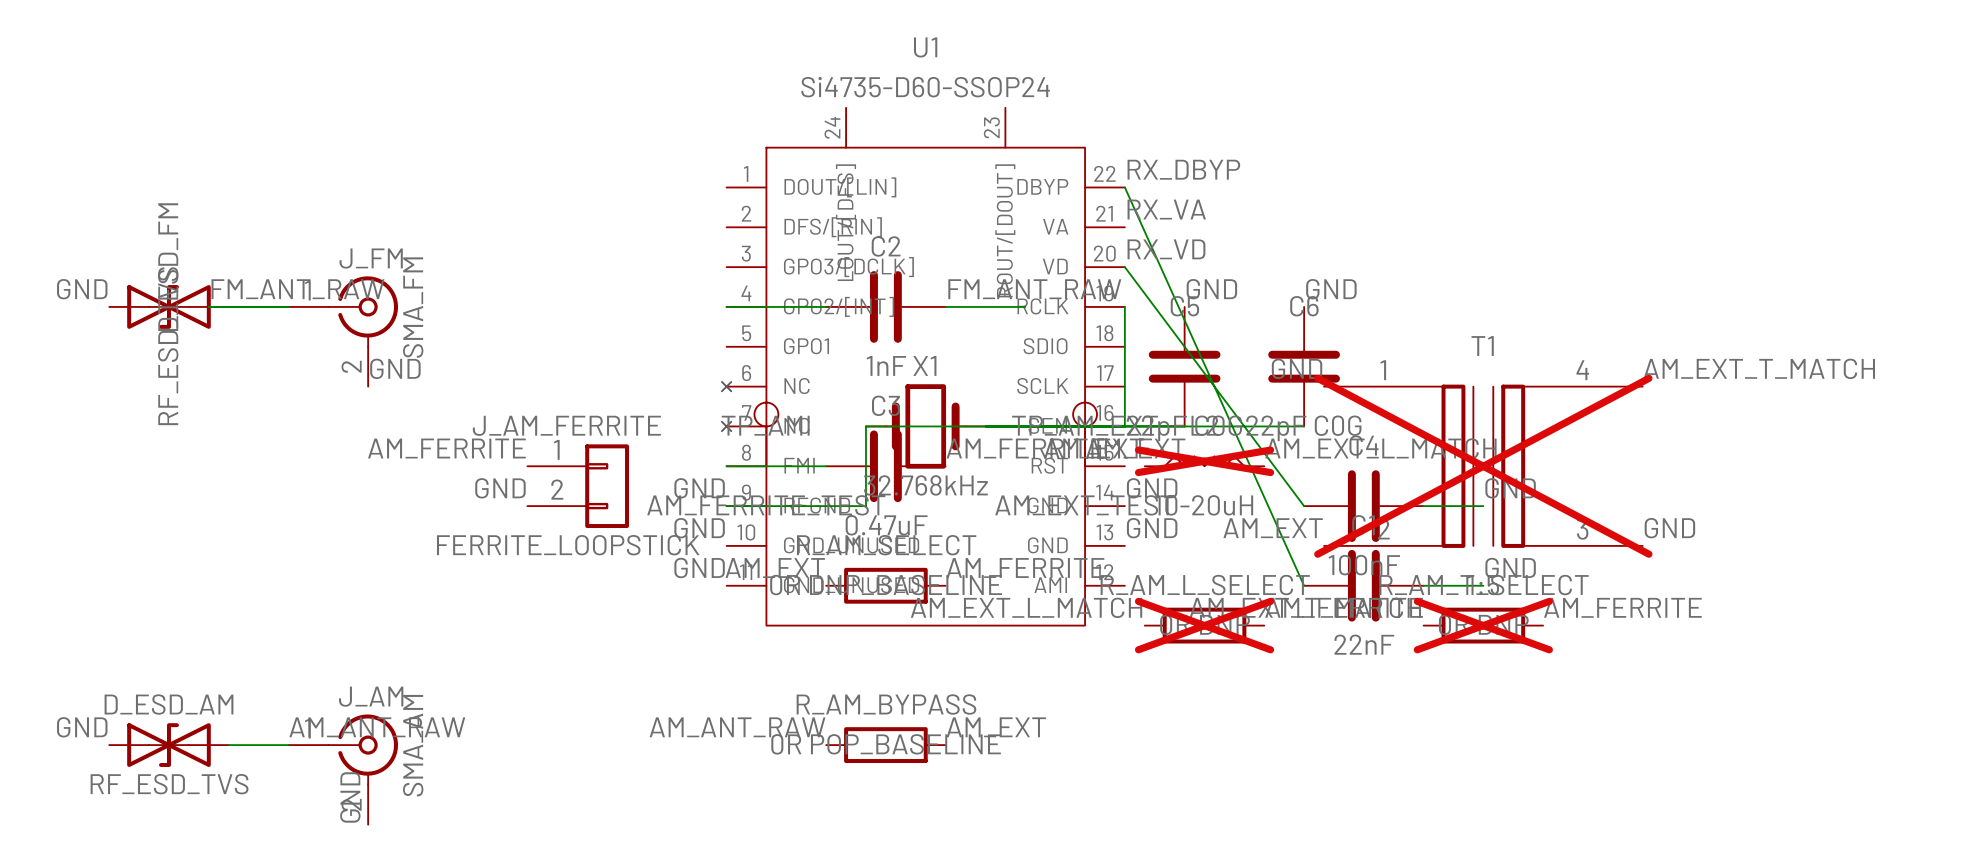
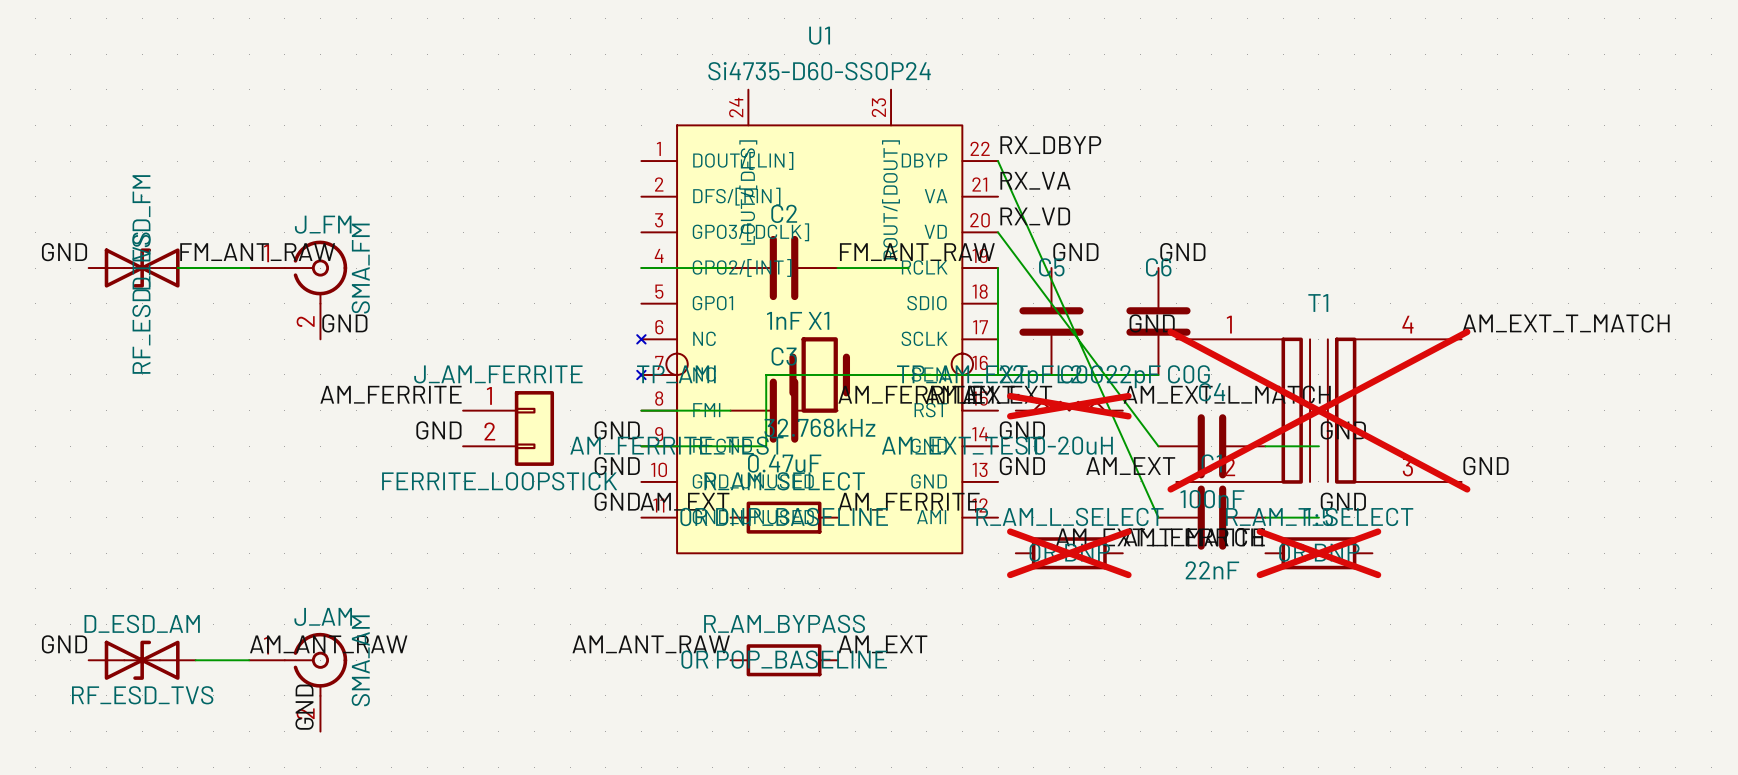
label: AM_EXT_L_MATCH (1026, 607) -> none
label: AM_FERRITE (1622, 607) -> none

